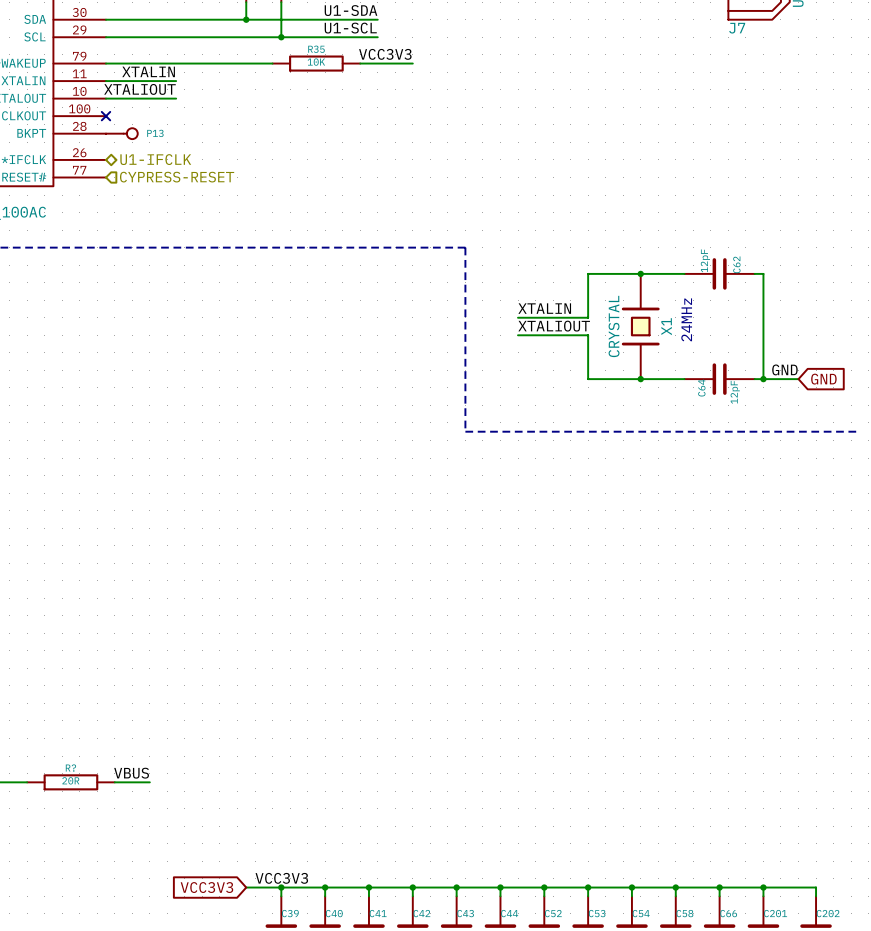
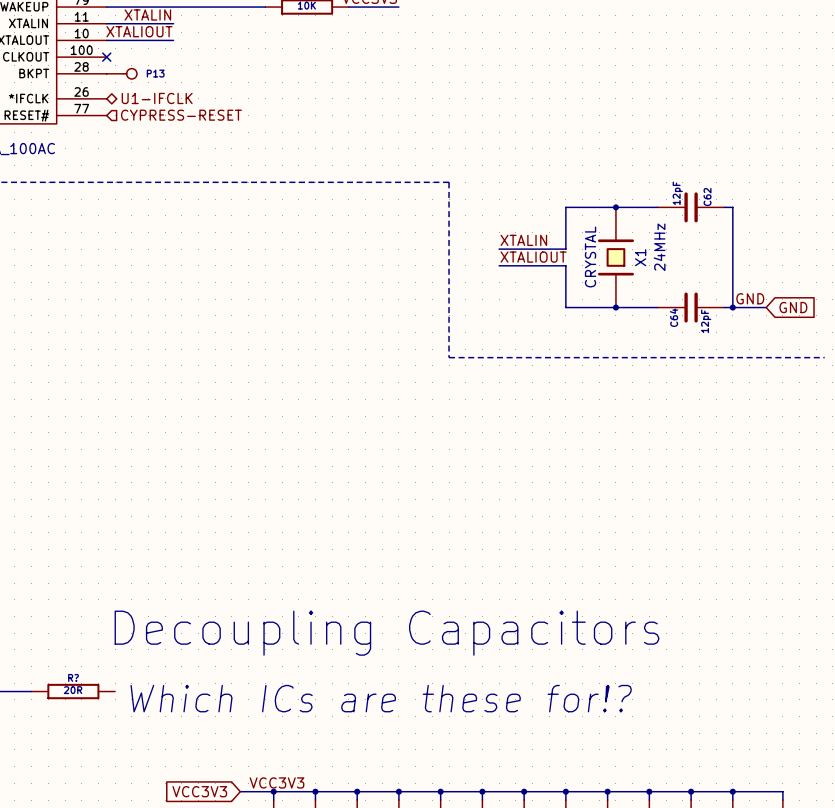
text: none -> Decoupling Capacitors (386, 633)
label: VBUS (131, 773) -> none
wire: (114, 782) (149, 782) -> none
text: none -> Which ICs are these for!? (381, 698)

